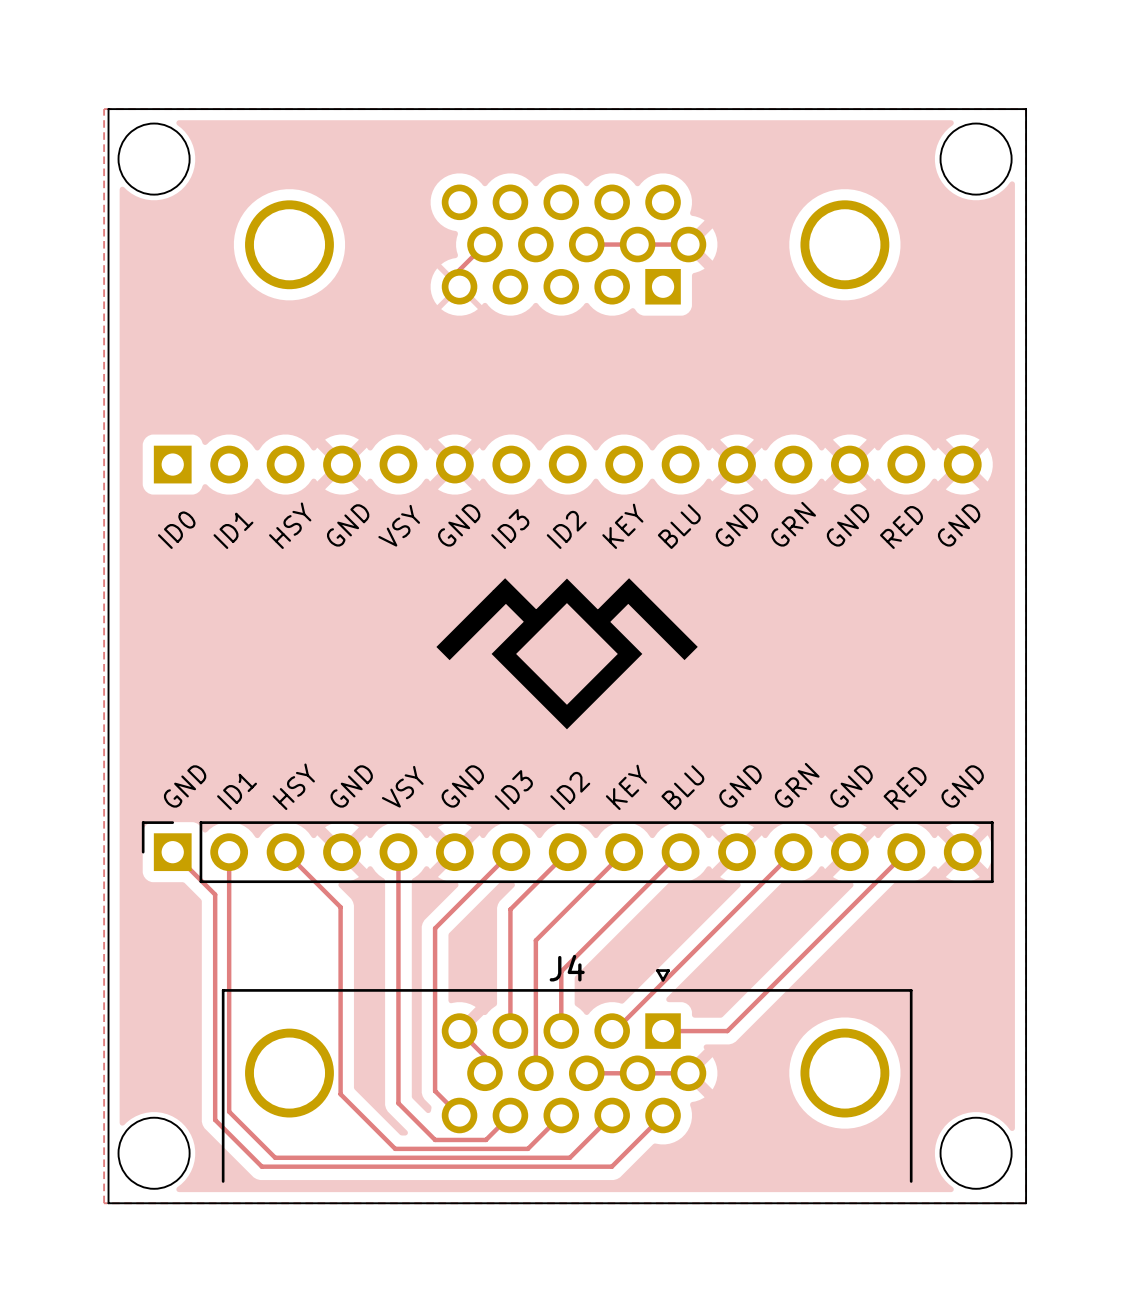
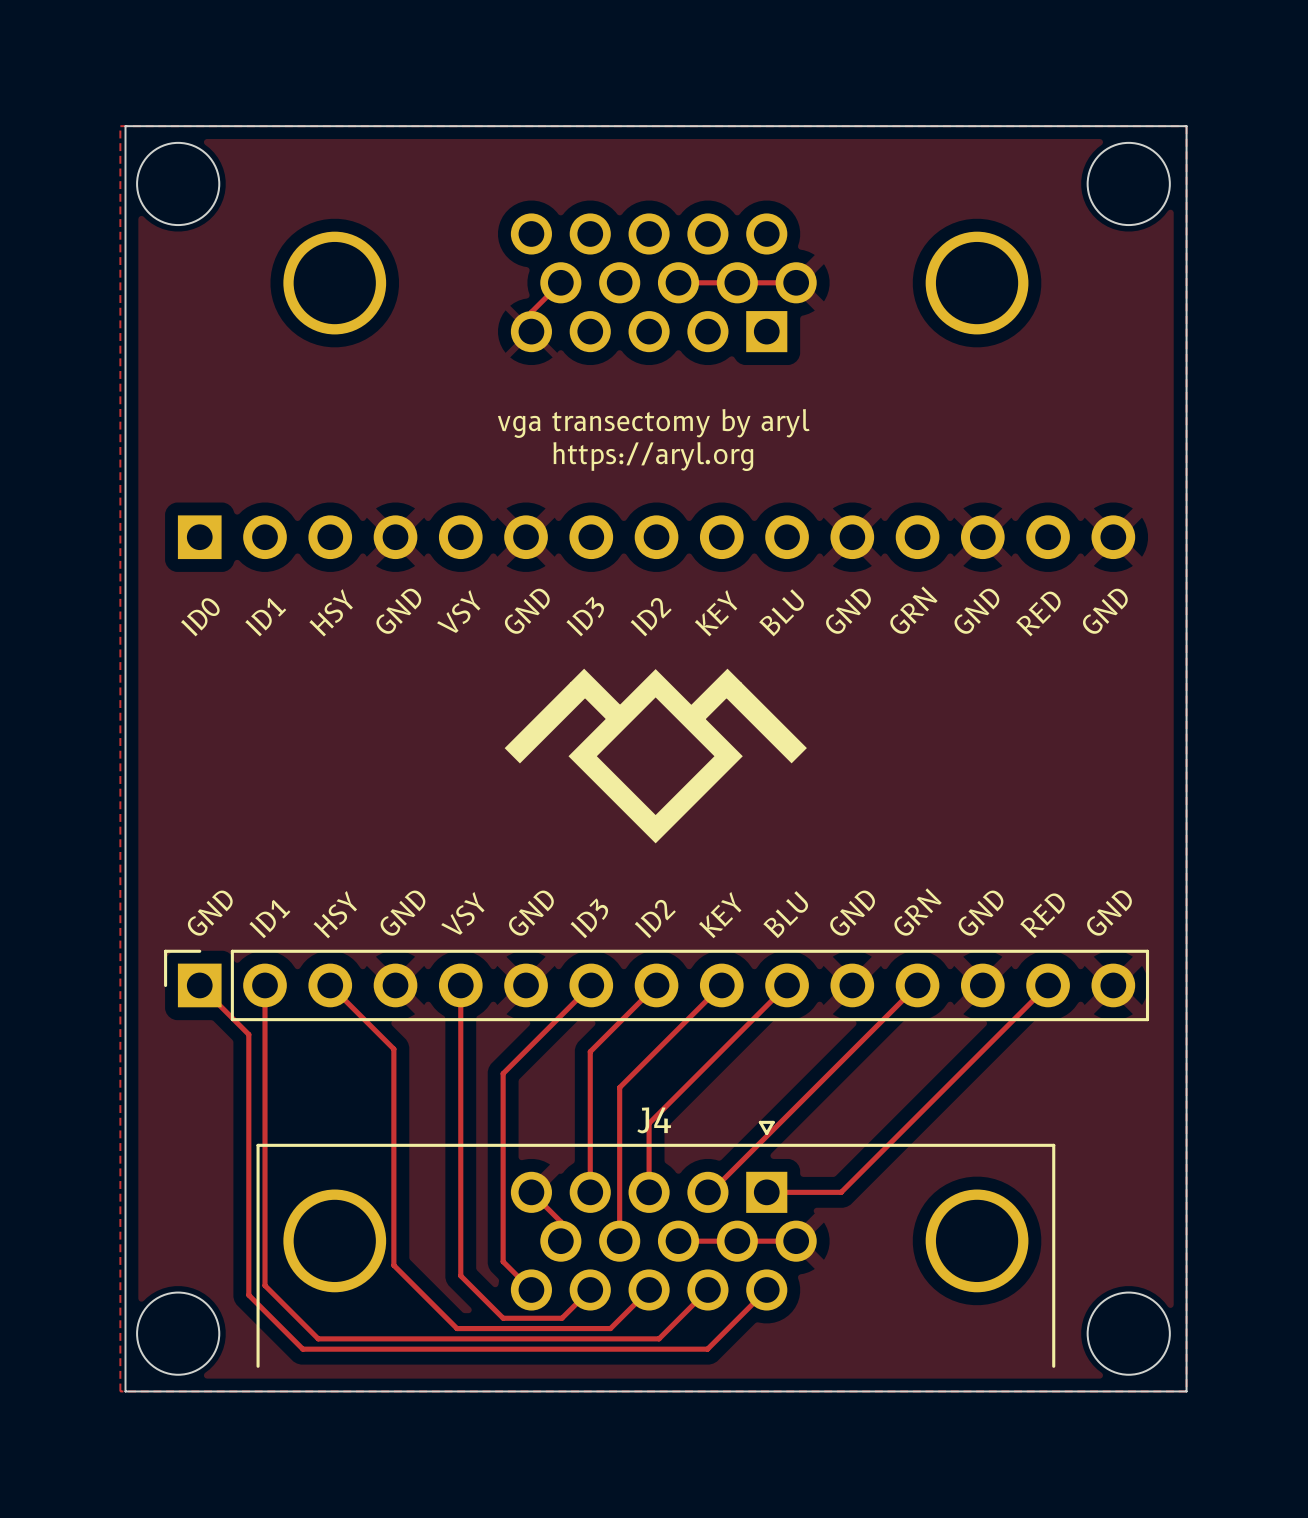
text: none -> vga transectomy by aryl (653, 423)
text: none -> https://aryl.org (653, 456)

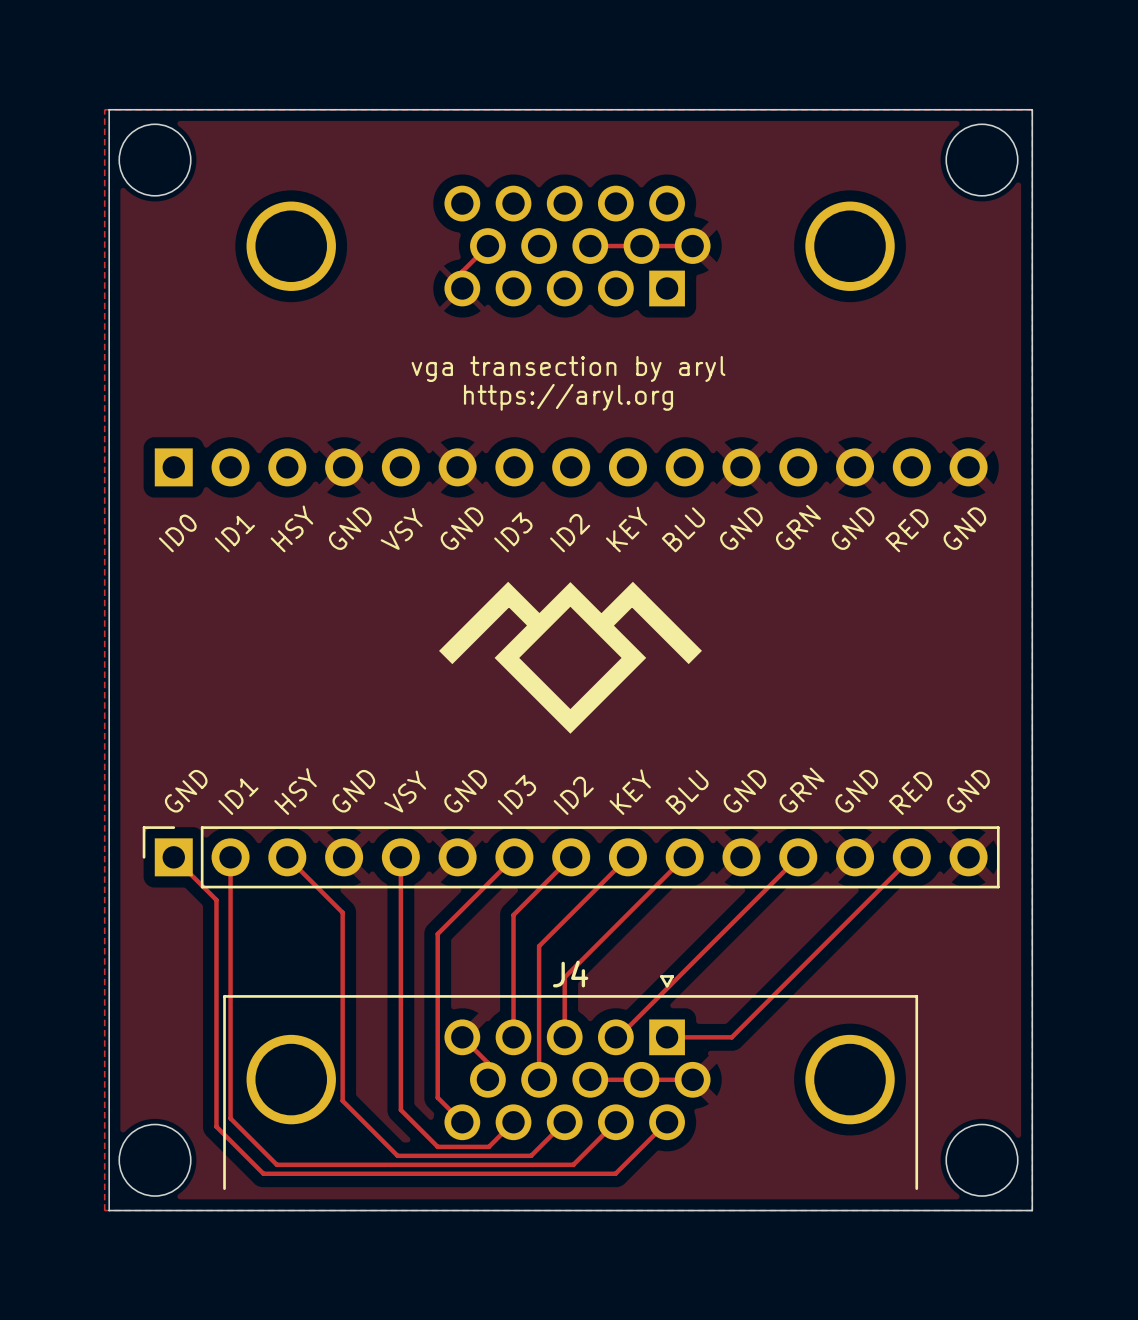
text: vga transectomy by aryl (653, 423) -> vga transection by aryl (568, 368)

